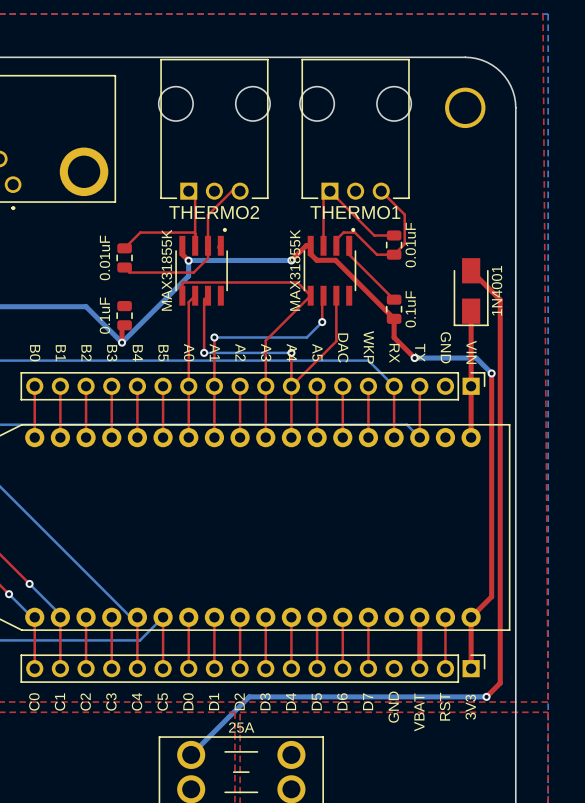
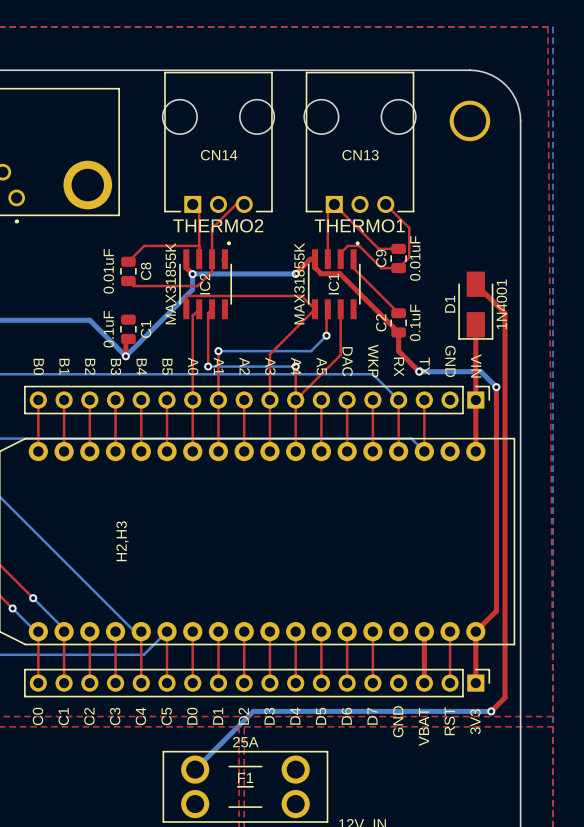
CN14 name: none -> CN14 (219, 155)
CN13 name: none -> CN13 (360, 155)
C9 name: none -> C9 (381, 258)
C8 name: none -> C8 (146, 271)
IC2 name: none -> IC2 (205, 284)
IC1 name: none -> IC1 (333, 283)
D1 name: none -> D1 (450, 304)
C2 name: none -> C2 (381, 322)
C1 name: none -> C1 (146, 329)
H2,H3 name: none -> H2,H3 (122, 541)
F1 name: none -> F1 (245, 777)

